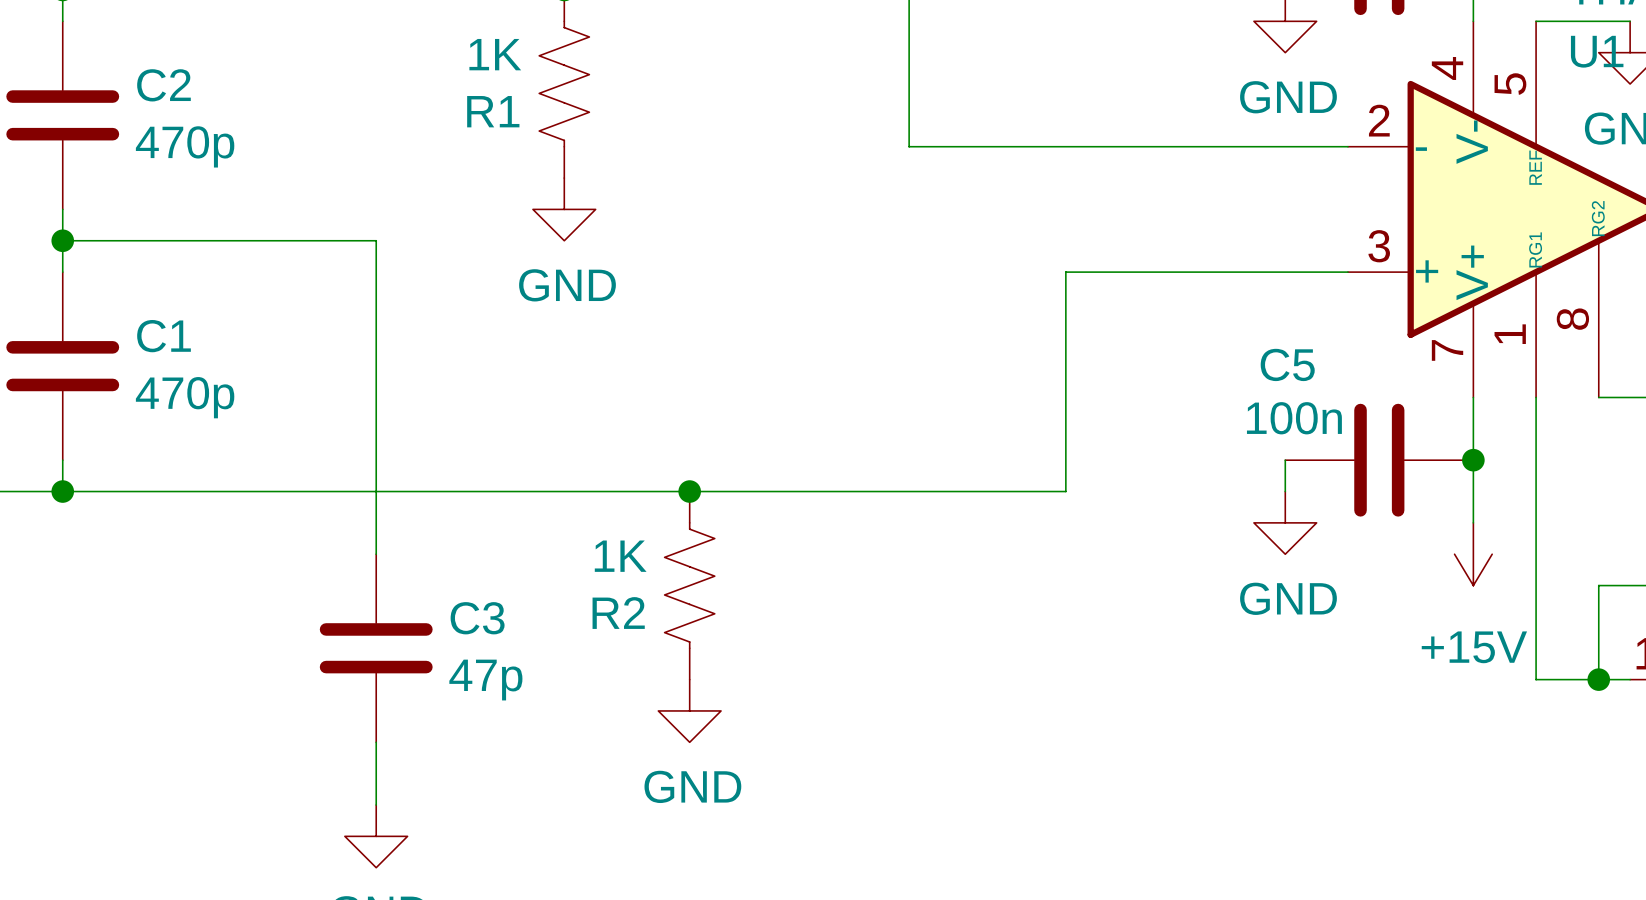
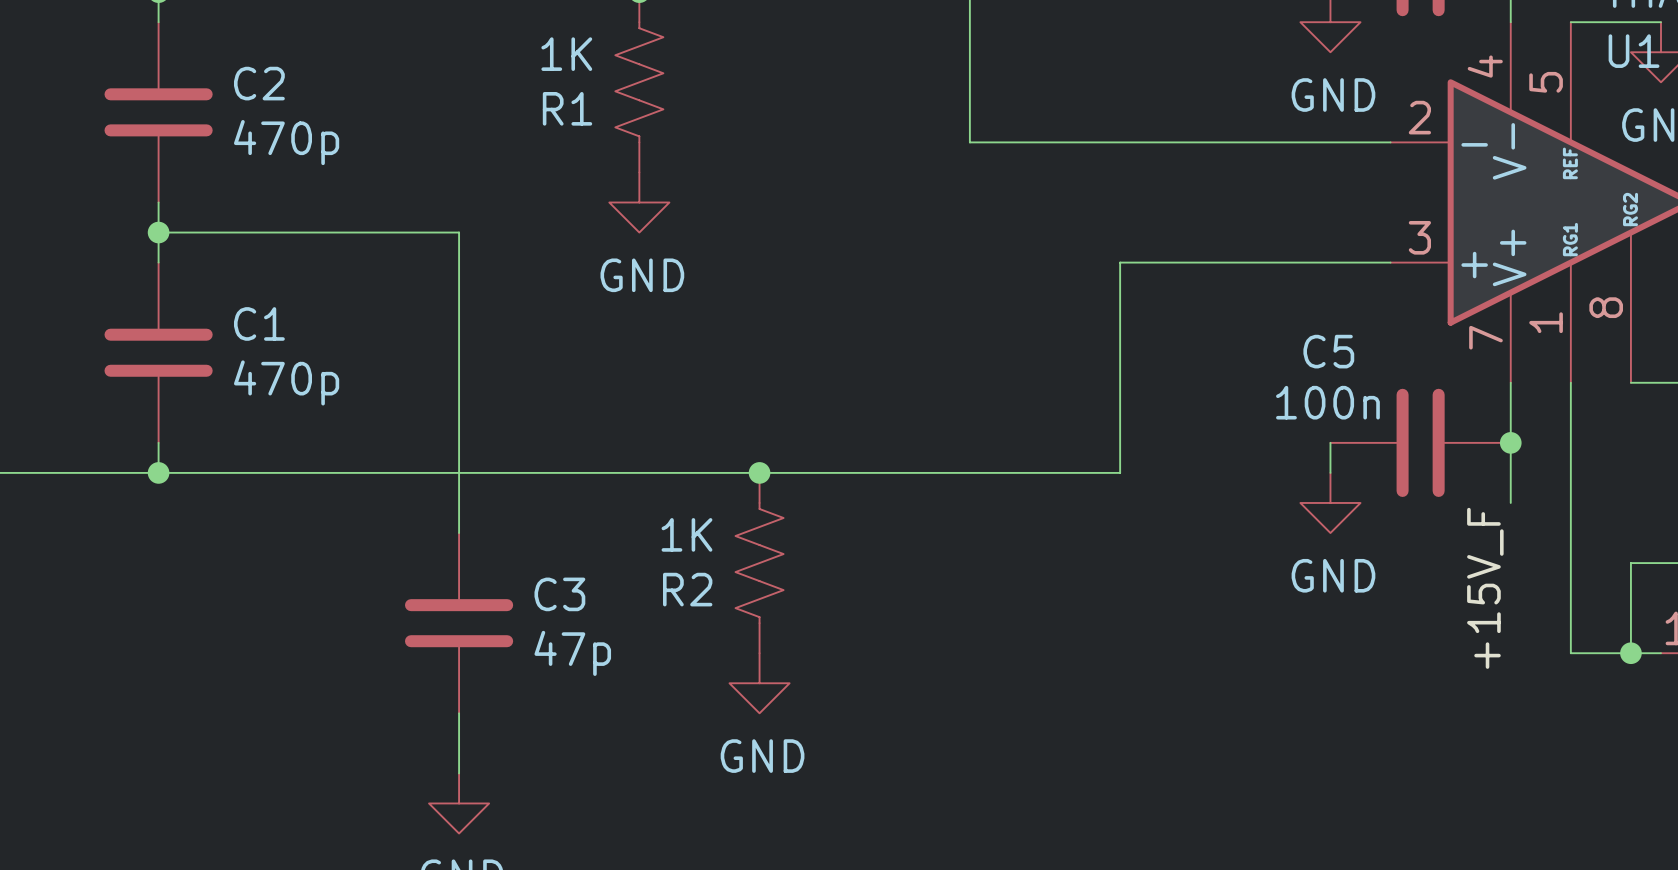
power symbol: +15V (1473, 554) -> none
label: none -> +15V_F (1485, 588)

